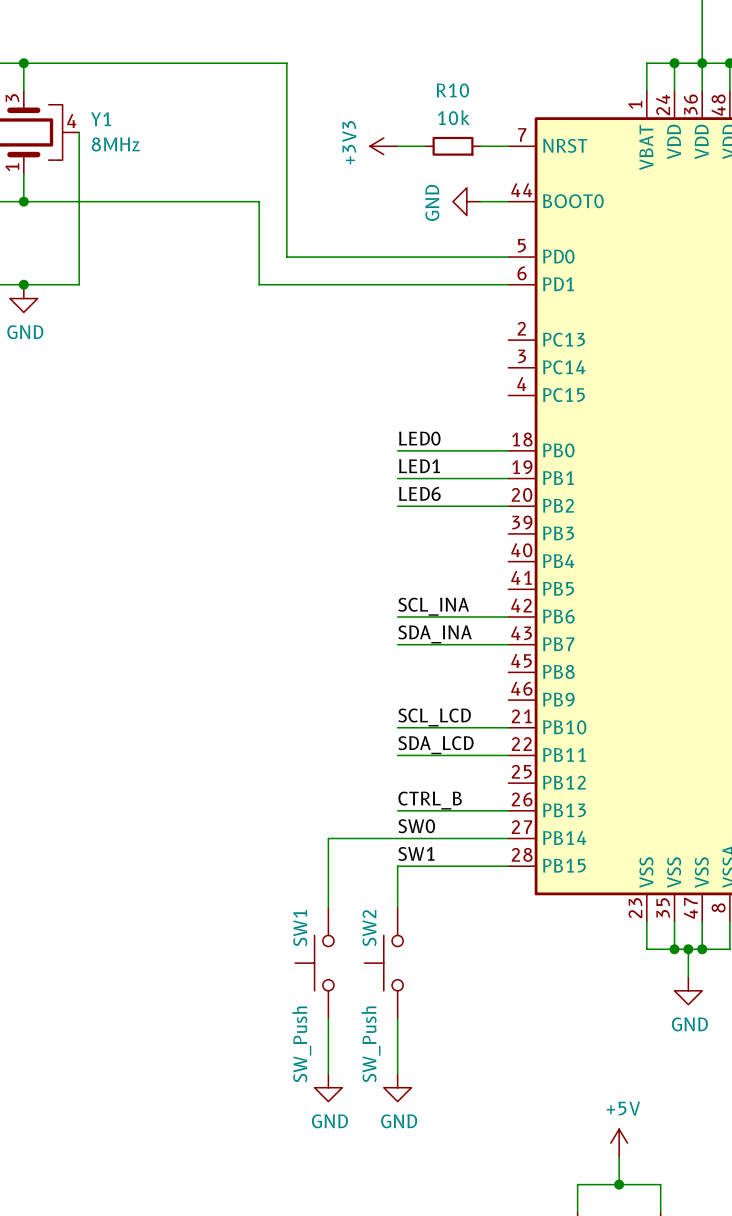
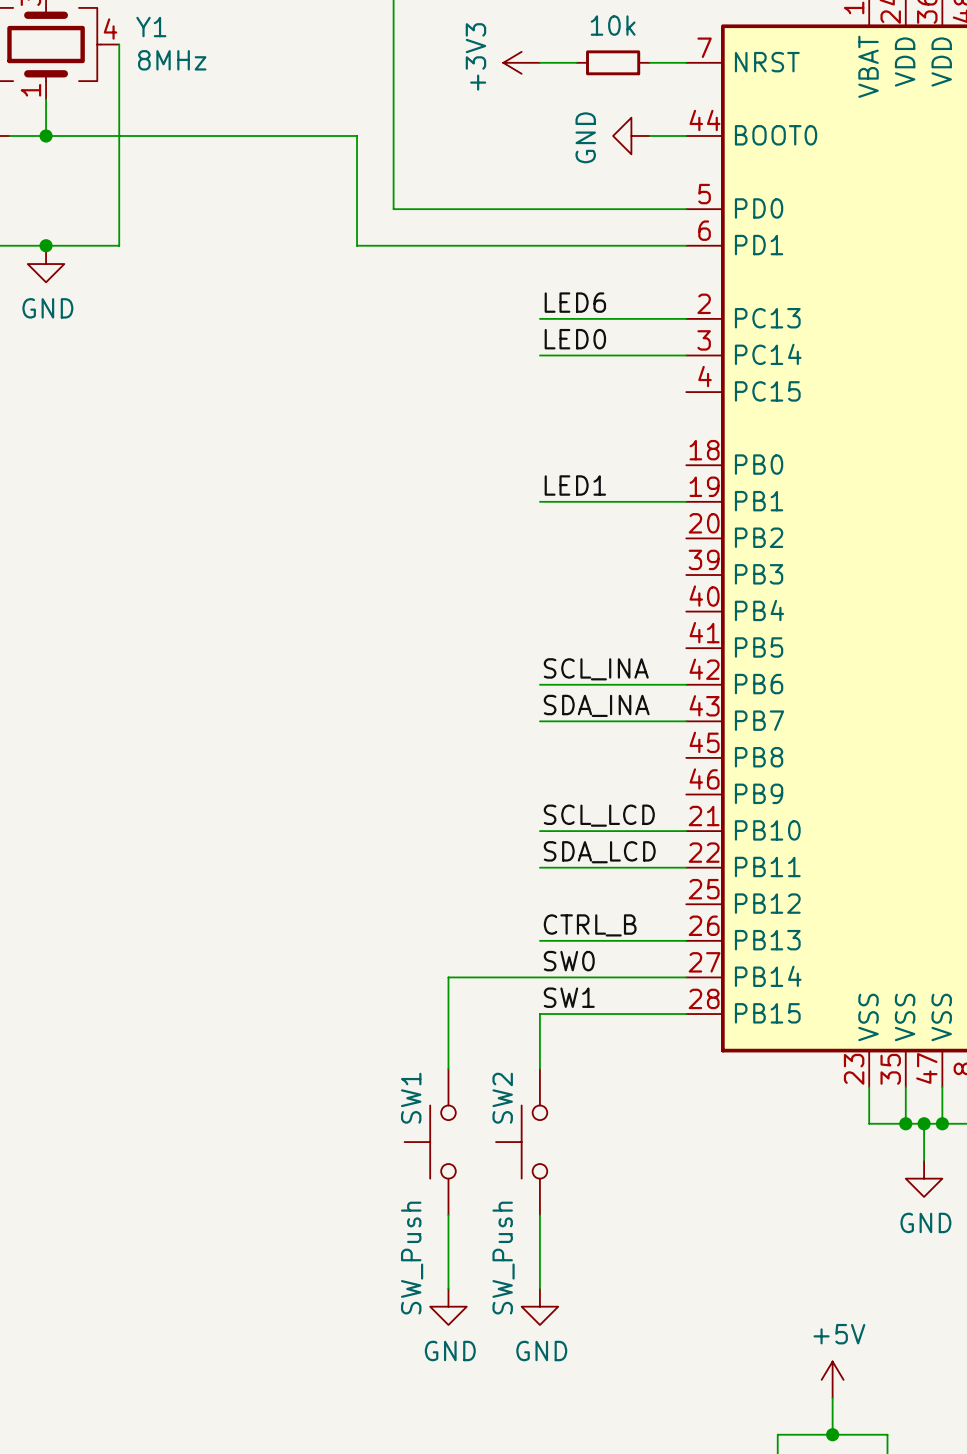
label position: LED0 (419, 438) -> LED0 (575, 339)
wire: (397, 450) (508, 450) -> (539, 355) (686, 355)
label position: LED6 (419, 493) -> LED6 (575, 302)
wire: (397, 506) (508, 506) -> (539, 318) (686, 318)

